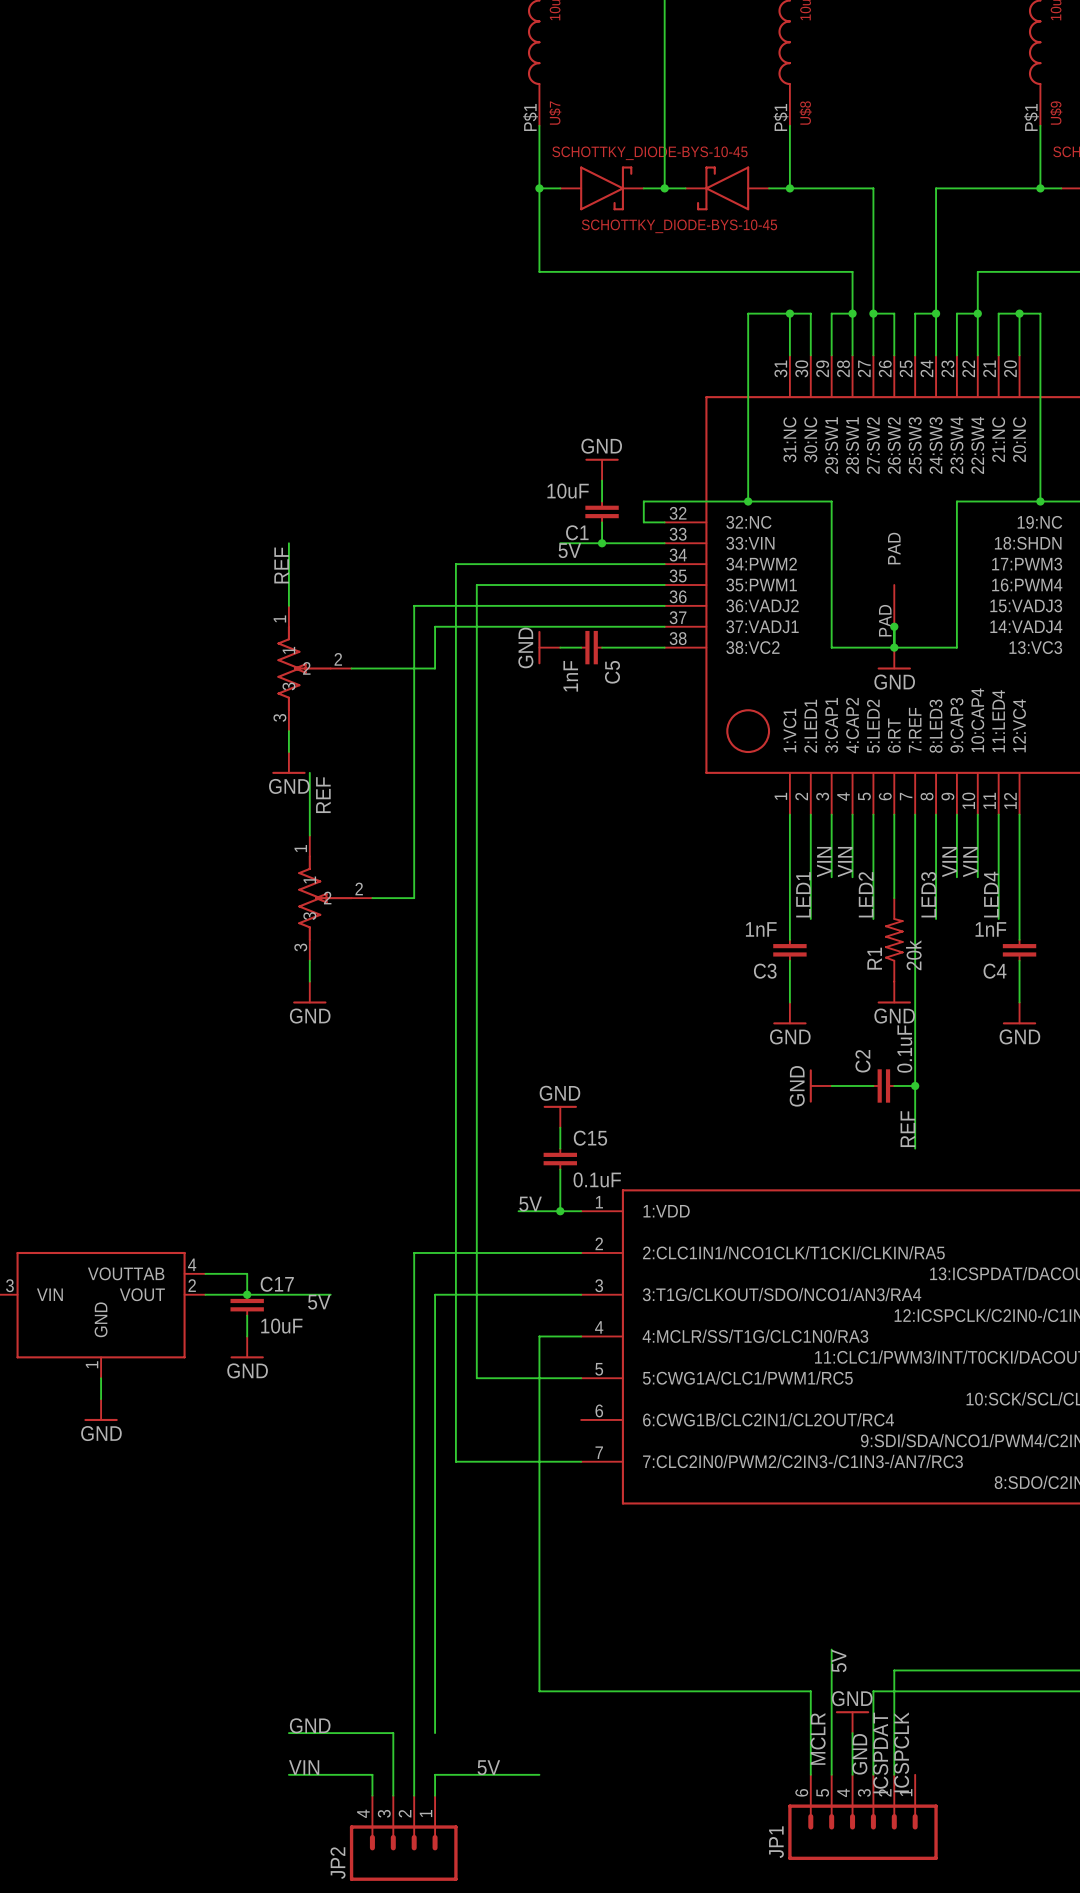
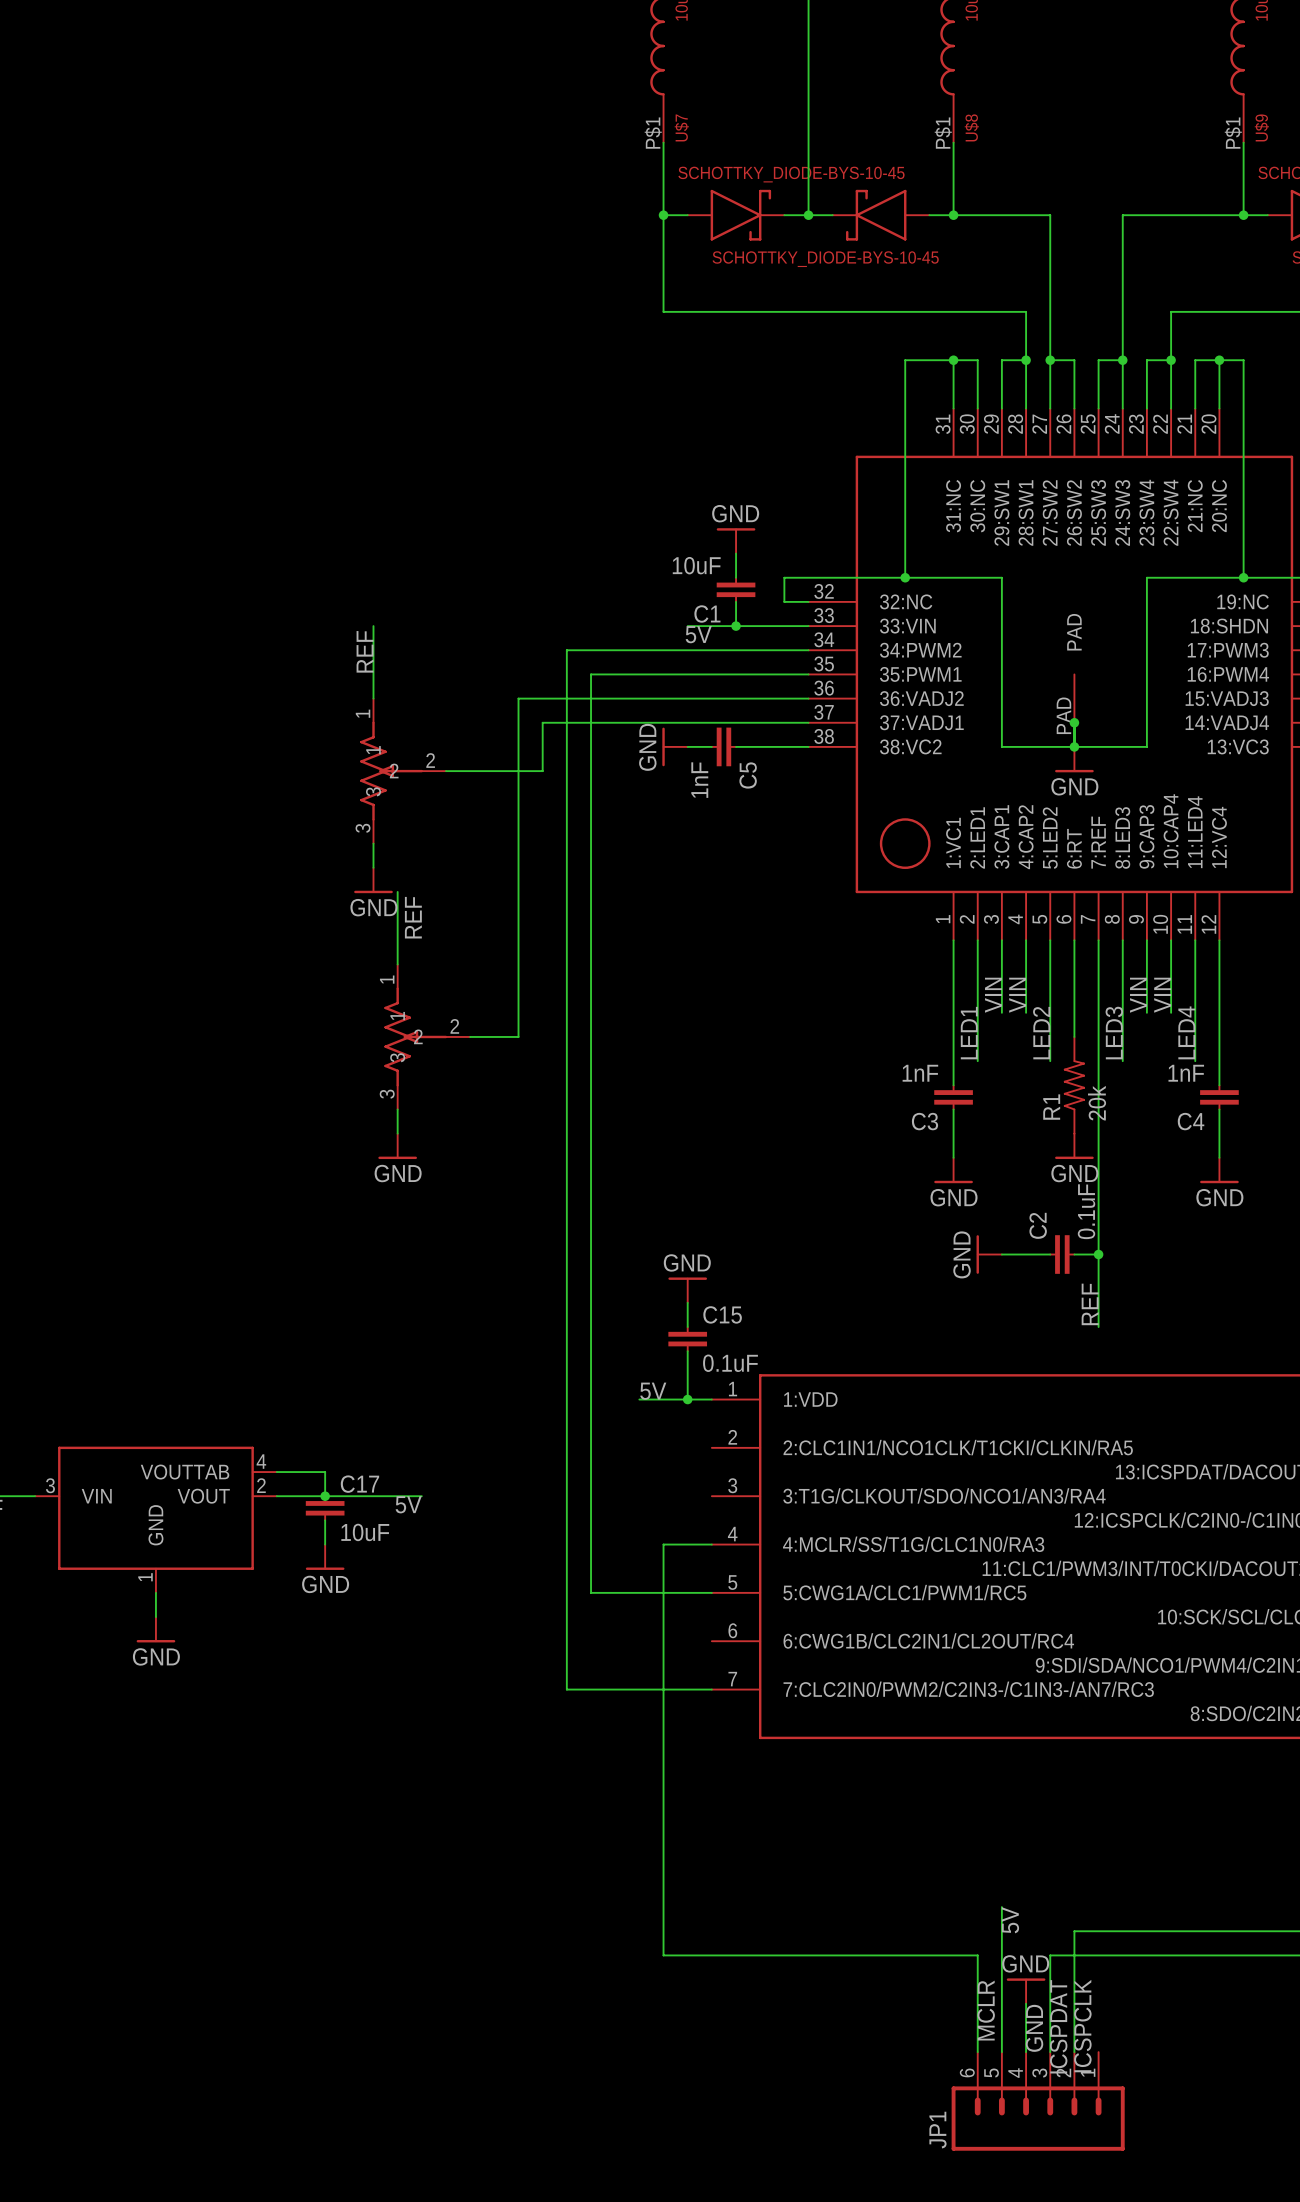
wire: (581, 1252) (414, 1252) (414, 1795) -> none
wire: (581, 1294) (435, 1294) (435, 1733) -> none
label: GND (310, 1725) -> none
wire: (288, 1733) (393, 1733) (393, 1795) -> none
label: VIN (304, 1767) -> none
label: 5V (488, 1767) -> none
wire: (288, 1774) (372, 1774) (372, 1795) -> none
wire: (539, 1774) (435, 1774) (435, 1795) -> none
JP2: (403, 1838) -> none

